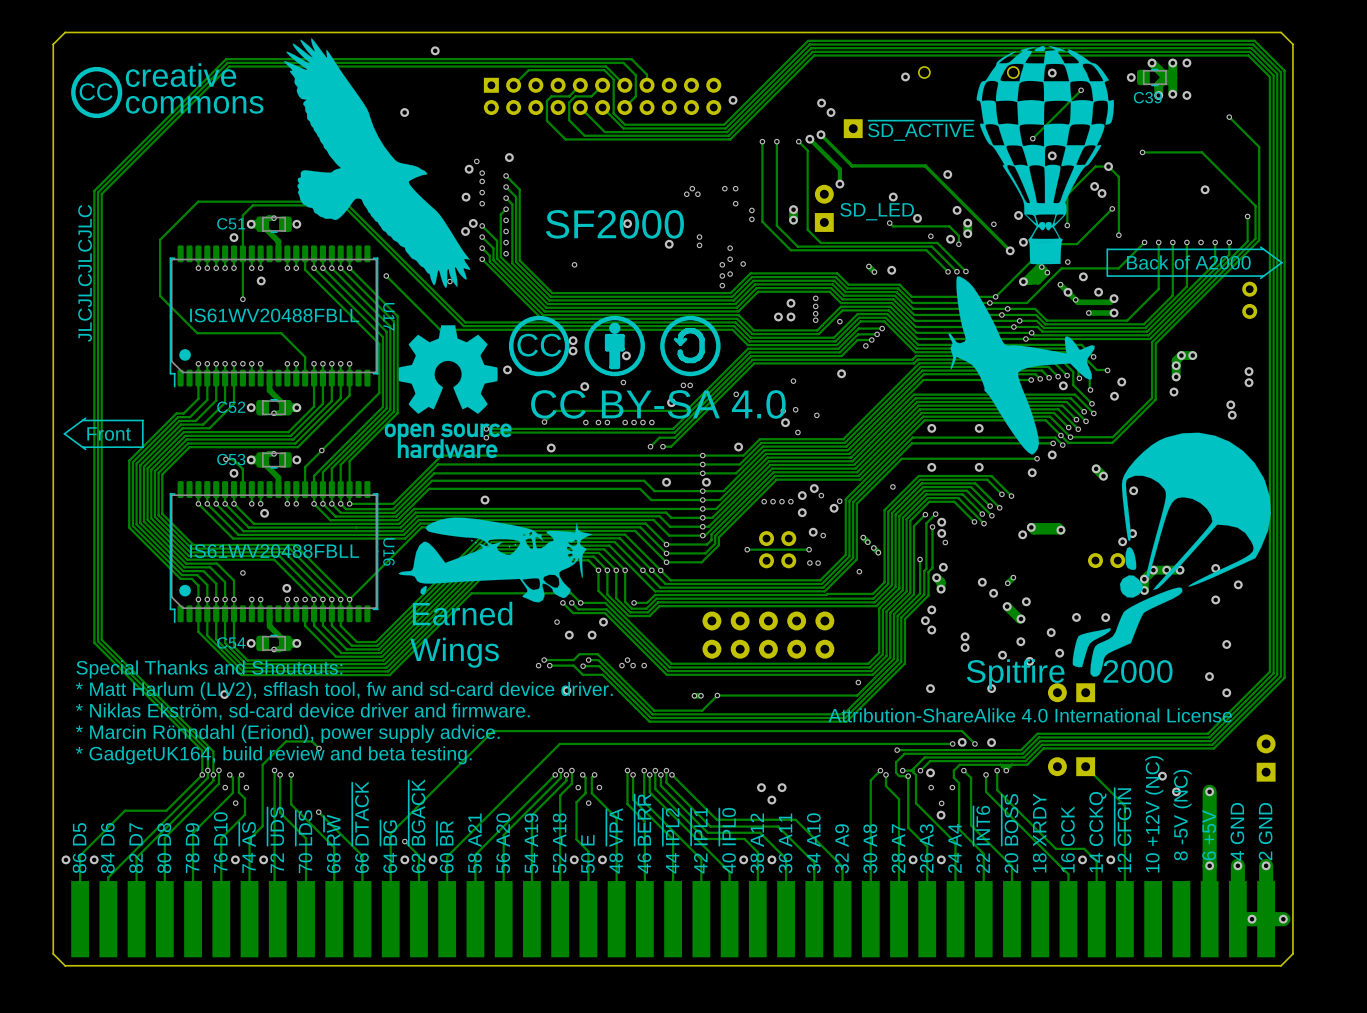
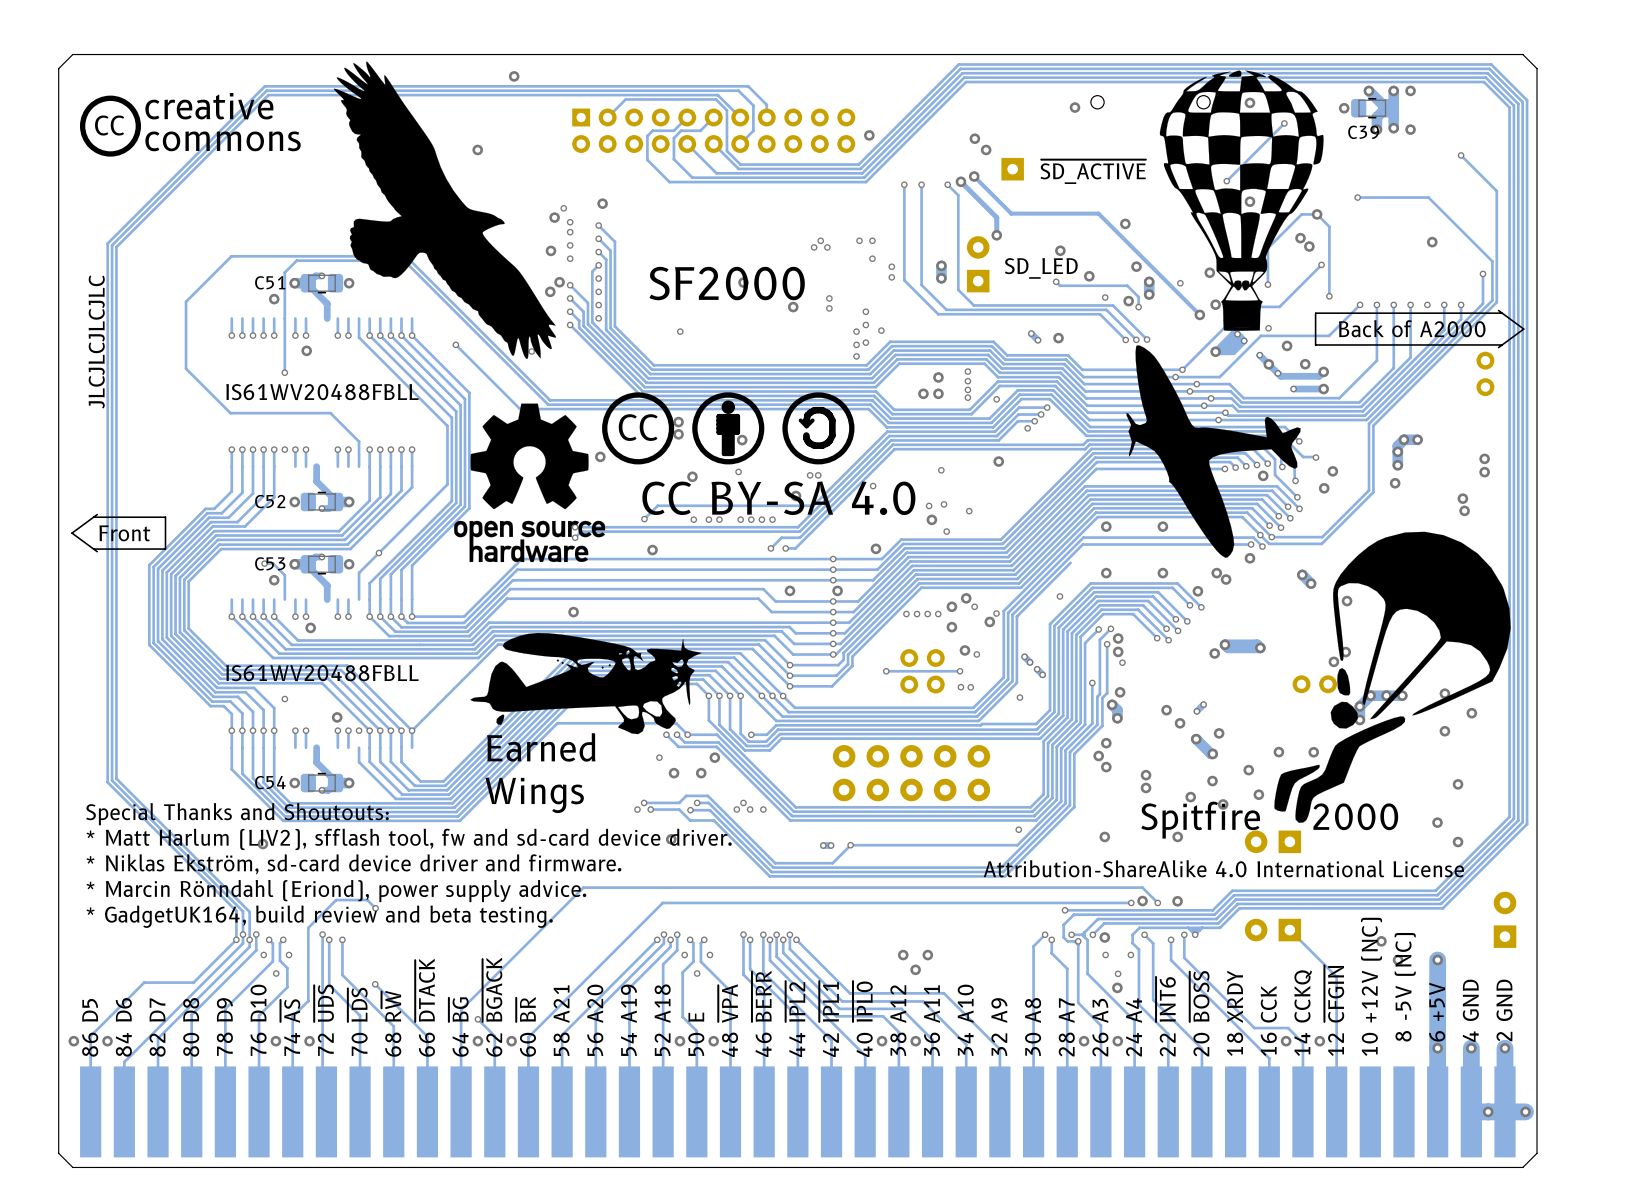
U17: (274, 316) -> none
track: (1037, 458) (901, 458) -> none
via: (1037, 458) -> none
via: none -> (1216, 573)
via: none -> (1197, 591)
U16: (274, 552) -> none

